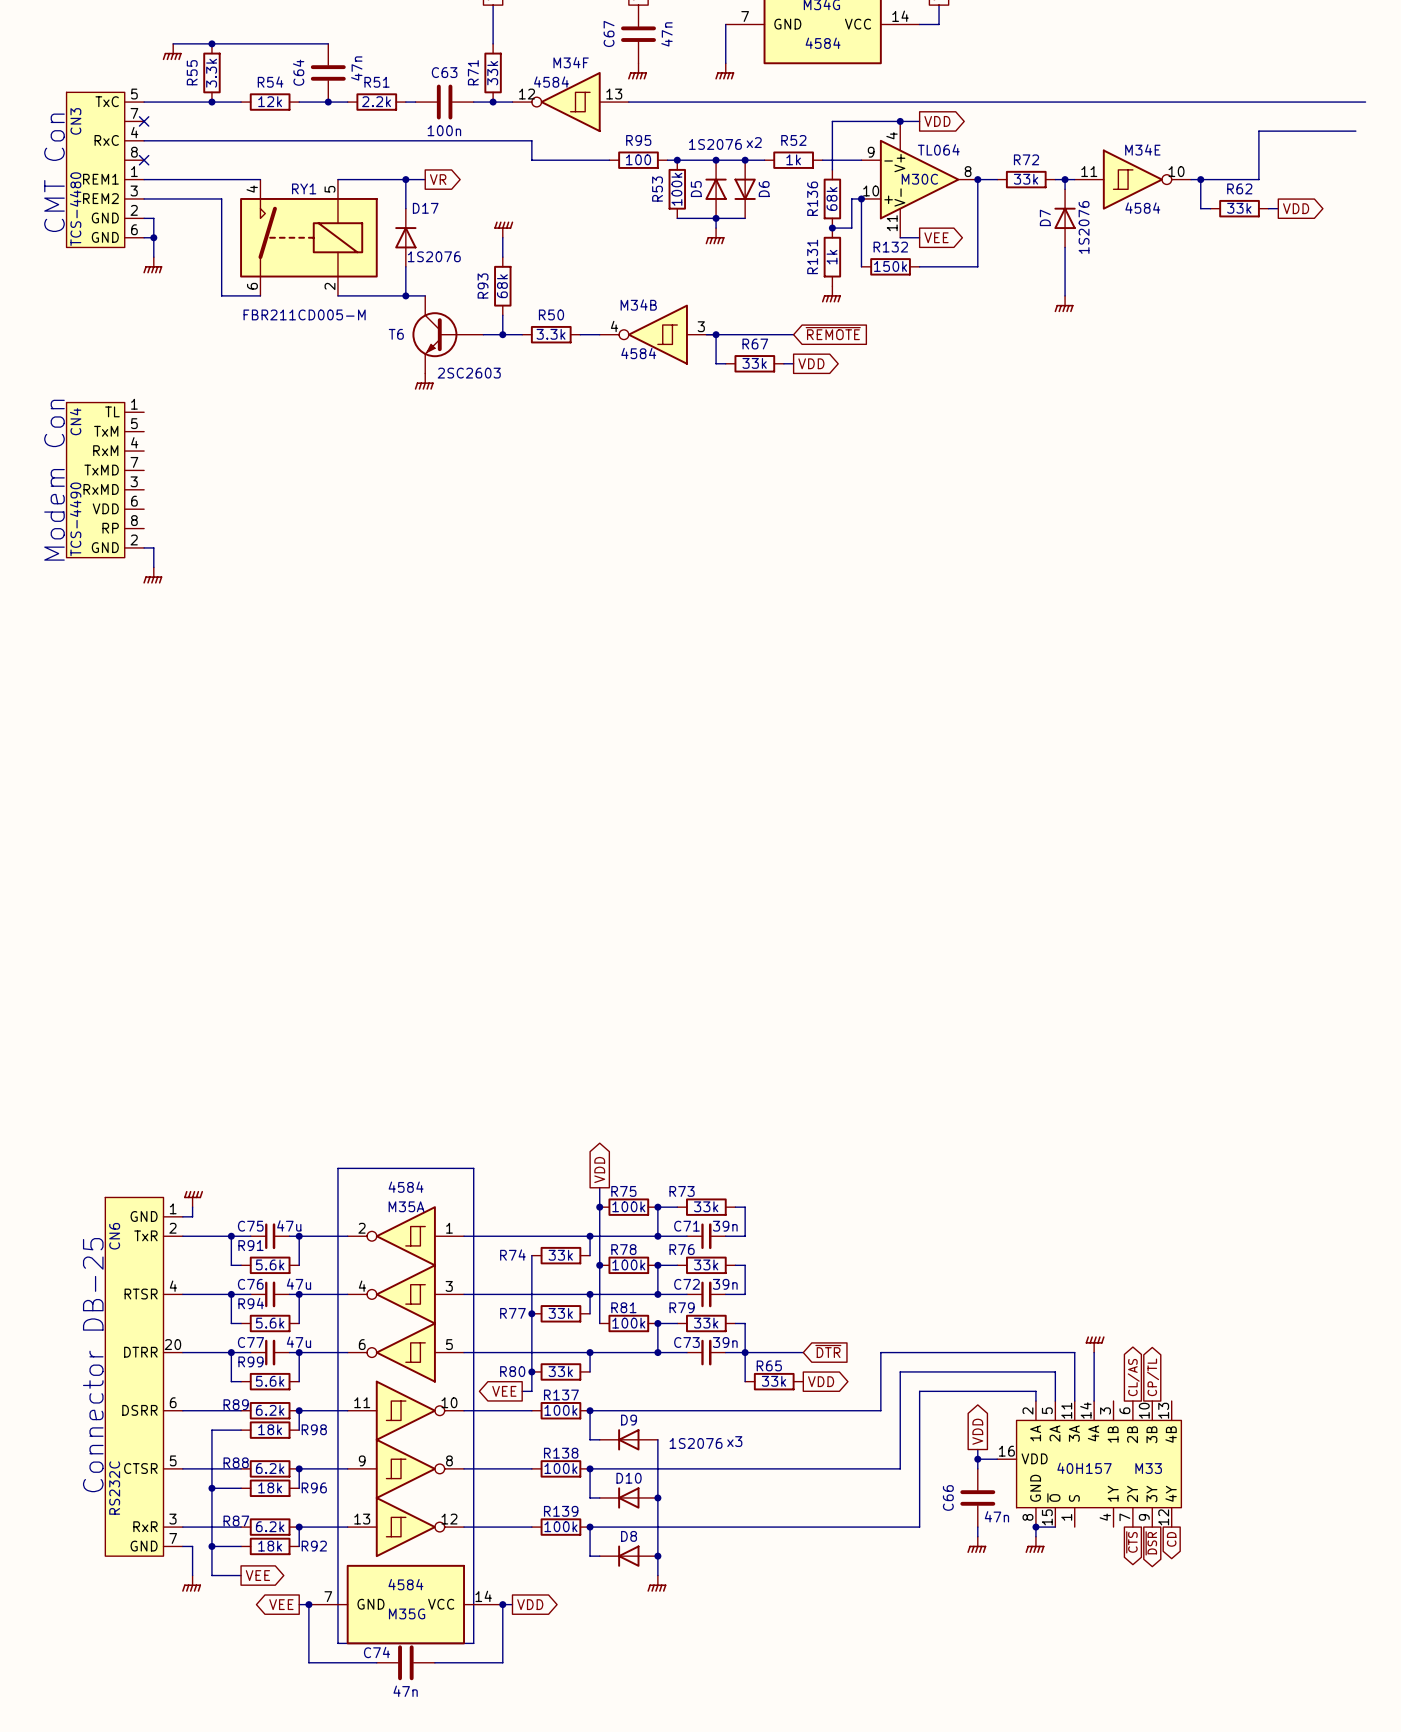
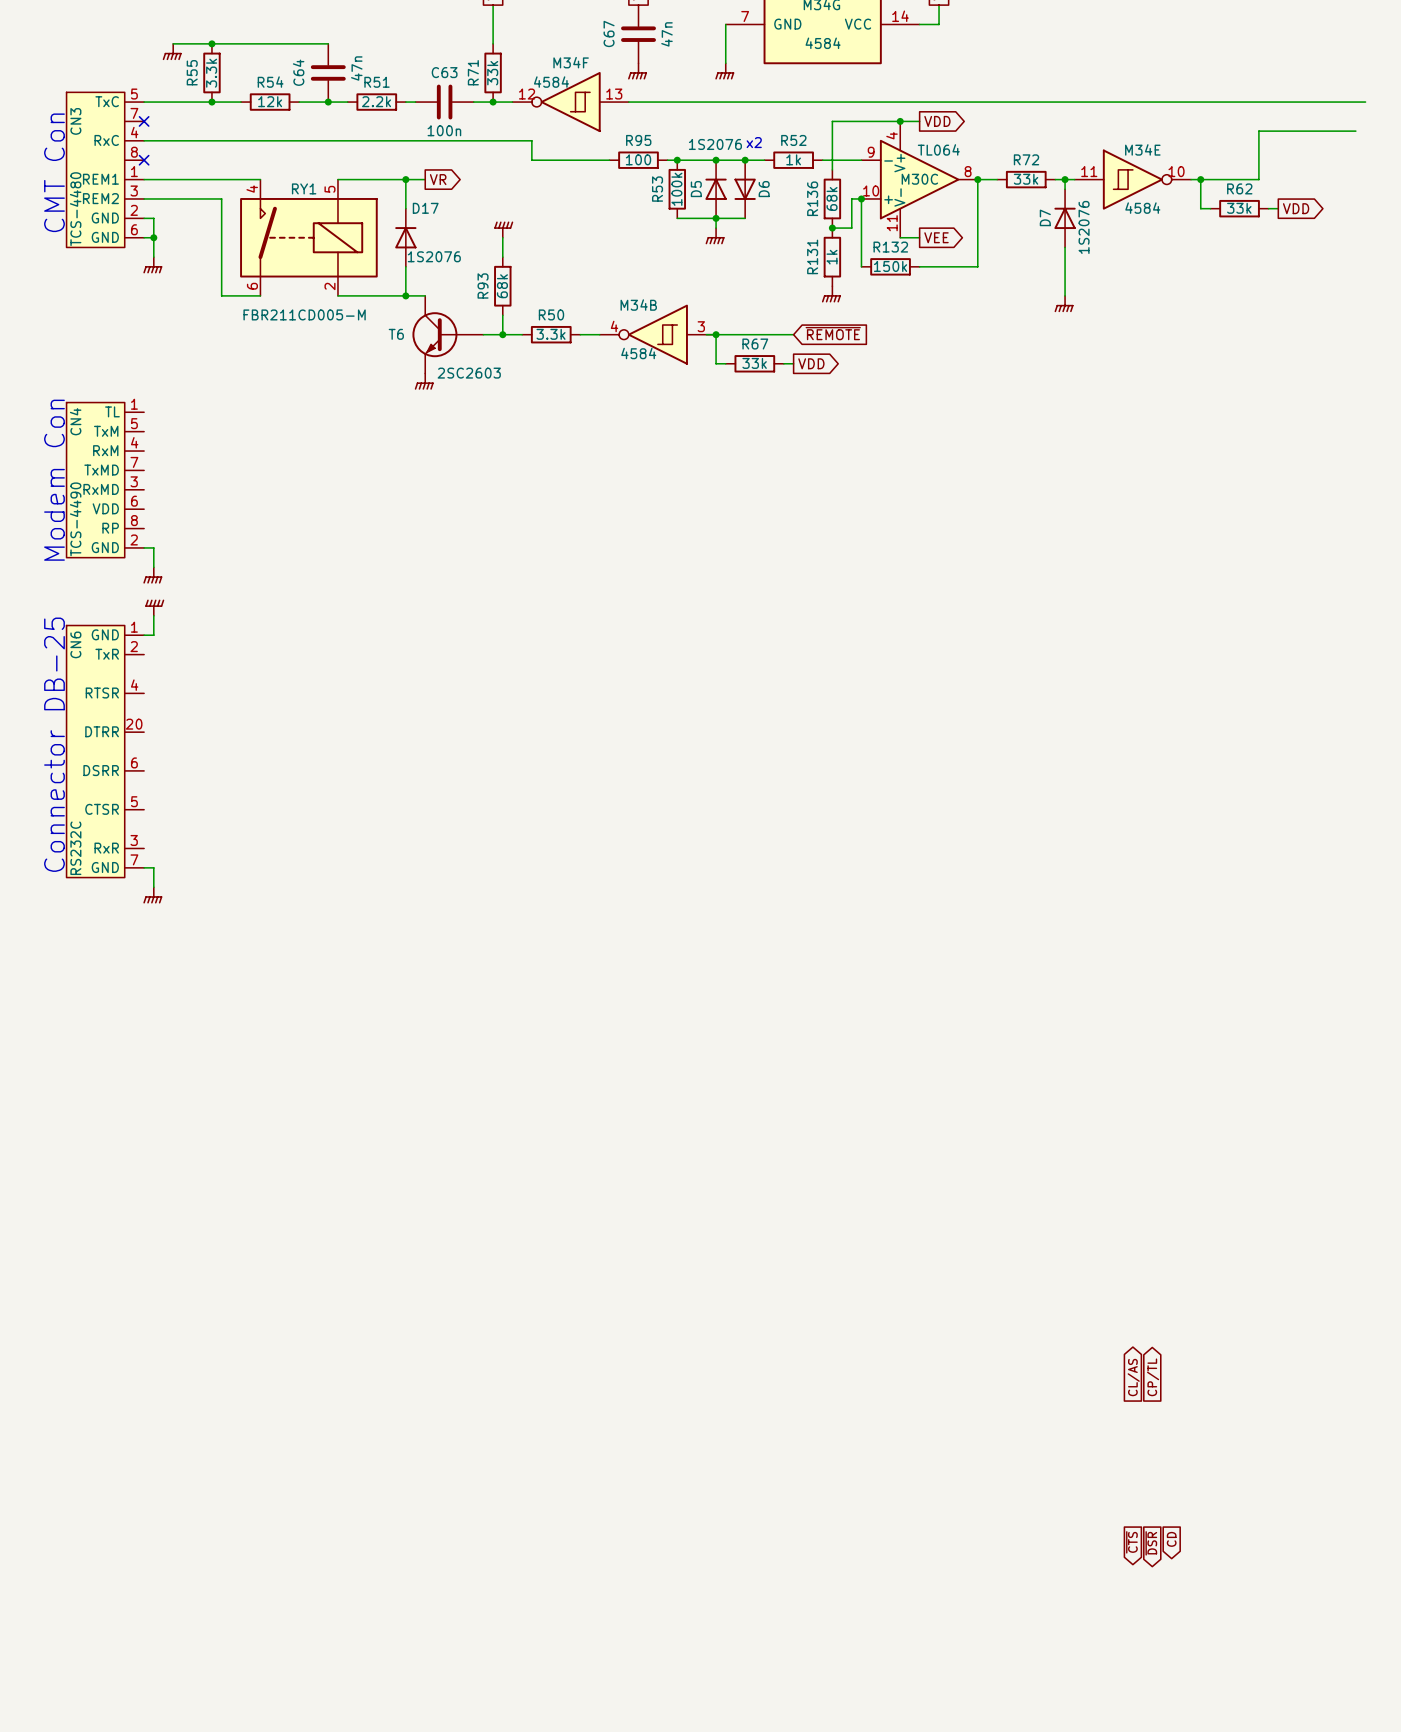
power symbol: none -> (154, 607)
wire: none -> (153, 615) (153, 635) (144, 635)
text: none -> Connector DB-25 (54, 744)
wire: none -> (144, 867) (153, 867) (153, 887)
power symbol: none -> (152, 895)
line: (337, 1168) (337, 1643) (473, 1643) (473, 1168) (337, 1168) -> none
global label: VDD (599, 1169) -> none
wire: (599, 1187) (599, 1323) -> none
CN6 symbol: [105, 1197, 183, 1557] -> [66, 625, 145, 878]
power symbol: (193, 1199) -> none
wire: (192, 1207) (192, 1216) (182, 1216) -> none
junction: (599, 1207) -> none
R75: 100k (628, 1207) -> none
junction: (657, 1207) -> none
wire: (677, 1207) (657, 1207) (657, 1236) -> none
R73: 33k (706, 1207) -> none
wire: (735, 1207) (745, 1207) (745, 1236) (725, 1236) -> none
CN6 name position: CN6 (114, 1236) -> CN6 (75, 644)
wire: (182, 1236) (250, 1236) -> none
wire: (231, 1236) (231, 1265) (241, 1265) -> none
junction: (231, 1236) -> none
C75: 47u (270, 1236) -> none
wire: (289, 1236) (347, 1236) -> none
wire: (299, 1236) (299, 1265) -> none
junction: (299, 1236) -> none
M35A: 4584 (405, 1236) -> none
wire: (464, 1236) (686, 1236) -> none
wire: (590, 1236) (590, 1255) -> none
junction: (590, 1236) -> none
junction: (657, 1236) -> none
C71: 39n (706, 1236) -> none
wire: (531, 1255) (531, 1391) (522, 1391) -> none
R74: 33k (560, 1255) -> none
R91: 5.6k (270, 1265) -> none
junction: (599, 1265) -> none
R78: 100k (628, 1265) -> none
junction: (657, 1265) -> none
wire: (677, 1265) (657, 1265) (657, 1294) -> none
R76: 33k (706, 1265) -> none
wire: (735, 1265) (745, 1265) (745, 1294) (725, 1294) -> none
wire: (182, 1294) (250, 1294) -> none
wire: (231, 1294) (231, 1323) (241, 1323) -> none
junction: (231, 1294) -> none
C76: 47u (270, 1294) -> none
wire: (289, 1294) (347, 1294) -> none
wire: (299, 1294) (299, 1323) -> none
junction: (299, 1294) -> none
part: (405, 1294) -> none
wire: (464, 1294) (686, 1294) -> none
wire: (590, 1294) (590, 1313) -> none
junction: (590, 1294) -> none
junction: (657, 1294) -> none
C72: 39n (706, 1294) -> none
junction: (531, 1313) -> none
R77: 33k (560, 1313) -> none
R94: 5.6k (270, 1323) -> none
R81: 100k (628, 1323) -> none
junction: (657, 1323) -> none
wire: (677, 1323) (657, 1323) (657, 1352) -> none
R79: 33k (706, 1323) -> none
wire: (735, 1323) (745, 1323) (745, 1381) -> none
power symbol: (1095, 1344) -> none
global label: ~{DTR} (828, 1351) -> none
wire: (182, 1352) (250, 1352) -> none
wire: (231, 1352) (231, 1381) (241, 1381) -> none
junction: (231, 1352) -> none
C77: 47u (270, 1352) -> none
wire: (289, 1352) (347, 1352) -> none
wire: (299, 1352) (299, 1381) -> none
junction: (299, 1352) -> none
part: (405, 1352) -> none
wire: (464, 1352) (686, 1352) -> none
wire: (590, 1352) (590, 1371) -> none
junction: (590, 1352) -> none
junction: (657, 1352) -> none
C73: 39n (706, 1352) -> none
wire: (725, 1352) (803, 1352) -> none
junction: (745, 1352) -> none
wire: (1094, 1352) (1094, 1401) -> none
text: Connector DB-25 (93, 1365) -> none
junction: (531, 1371) -> none
R80: 33k (560, 1371) -> none
R99: 5.6k (270, 1381) -> none
R65: 33k (774, 1381) -> none
global label: VDD (821, 1381) -> none
global label: VEE (504, 1391) -> none
wire: (1035, 1401) (1035, 1391) (919, 1391) (919, 1527) (590, 1527) (590, 1556) (599, 1556) -> none
wire: (1055, 1401) (1055, 1371) (900, 1371) (900, 1468) (590, 1468) (590, 1497) (599, 1497) -> none
wire: (1074, 1401) (1074, 1352) (880, 1352) (880, 1410) (590, 1410) (590, 1439) (599, 1439) -> none
wire: (182, 1410) (241, 1410) -> none
R89: 6.2k (270, 1410) -> none
junction: (299, 1410) -> none
wire: (347, 1410) (299, 1410) (299, 1430) -> none
part: (405, 1410) -> none
wire: (464, 1410) (531, 1410) -> none
R137: 100k (560, 1410) -> none
junction: (590, 1410) -> none
wire: (241, 1430) (211, 1430) (211, 1575) (241, 1575) -> none
R98: 18k (270, 1430) -> none
global label: VDD (977, 1431) -> none
D9: 1S2076 (628, 1439) -> none
wire: (657, 1439) (657, 1575) -> none
text: x3 (734, 1441) -> none
wire: (977, 1449) (977, 1468) -> none
wire: (977, 1459) (997, 1459) -> none
junction: (977, 1459) -> none
M33: 40H157 (1089, 1464) -> none
wire: (182, 1468) (241, 1468) -> none
R88: 6.2k (270, 1468) -> none
junction: (299, 1468) -> none
wire: (347, 1468) (299, 1468) (299, 1488) -> none
part: (405, 1468) -> none
wire: (464, 1468) (531, 1468) -> none
R138: 100k (560, 1468) -> none
junction: (590, 1468) -> none
wire: (211, 1488) (241, 1488) -> none
junction: (211, 1488) -> none
R96: 18k (270, 1488) -> none
D10: (628, 1497) -> none
junction: (657, 1497) -> none
C66: 47n (977, 1497) -> none
wire: (182, 1527) (241, 1527) -> none
R87: 6.2k (270, 1527) -> none
junction: (299, 1527) -> none
wire: (347, 1527) (299, 1527) (299, 1546) -> none
part: (405, 1527) -> none
wire: (464, 1527) (531, 1527) -> none
R139: 100k (560, 1527) -> none
junction: (590, 1527) -> none
wire: (977, 1527) (977, 1536) -> none
junction: (1035, 1527) -> none
wire: (1055, 1527) (1035, 1527) (1035, 1536) -> none
power symbol: (976, 1544) -> none
power symbol: (1034, 1544) -> none
wire: (182, 1546) (192, 1546) (192, 1575) -> none
wire: (211, 1546) (241, 1546) -> none
junction: (211, 1546) -> none
R92: 18k (270, 1546) -> none
D8: (628, 1556) -> none
junction: (657, 1556) -> none
global label: VEE (257, 1575) -> none
power symbol: (191, 1583) -> none
power symbol: (656, 1583) -> none
global label: VEE (281, 1604) -> none
wire: (299, 1604) (308, 1604) (308, 1662) (376, 1662) -> none
junction: (308, 1604) -> none
M35G: 4584 (405, 1604) -> none
junction: (502, 1604) -> none
wire: (512, 1604) (502, 1604) (502, 1662) (434, 1662) -> none
global label: VDD (530, 1604) -> none
C74: 47n (405, 1662) -> none

